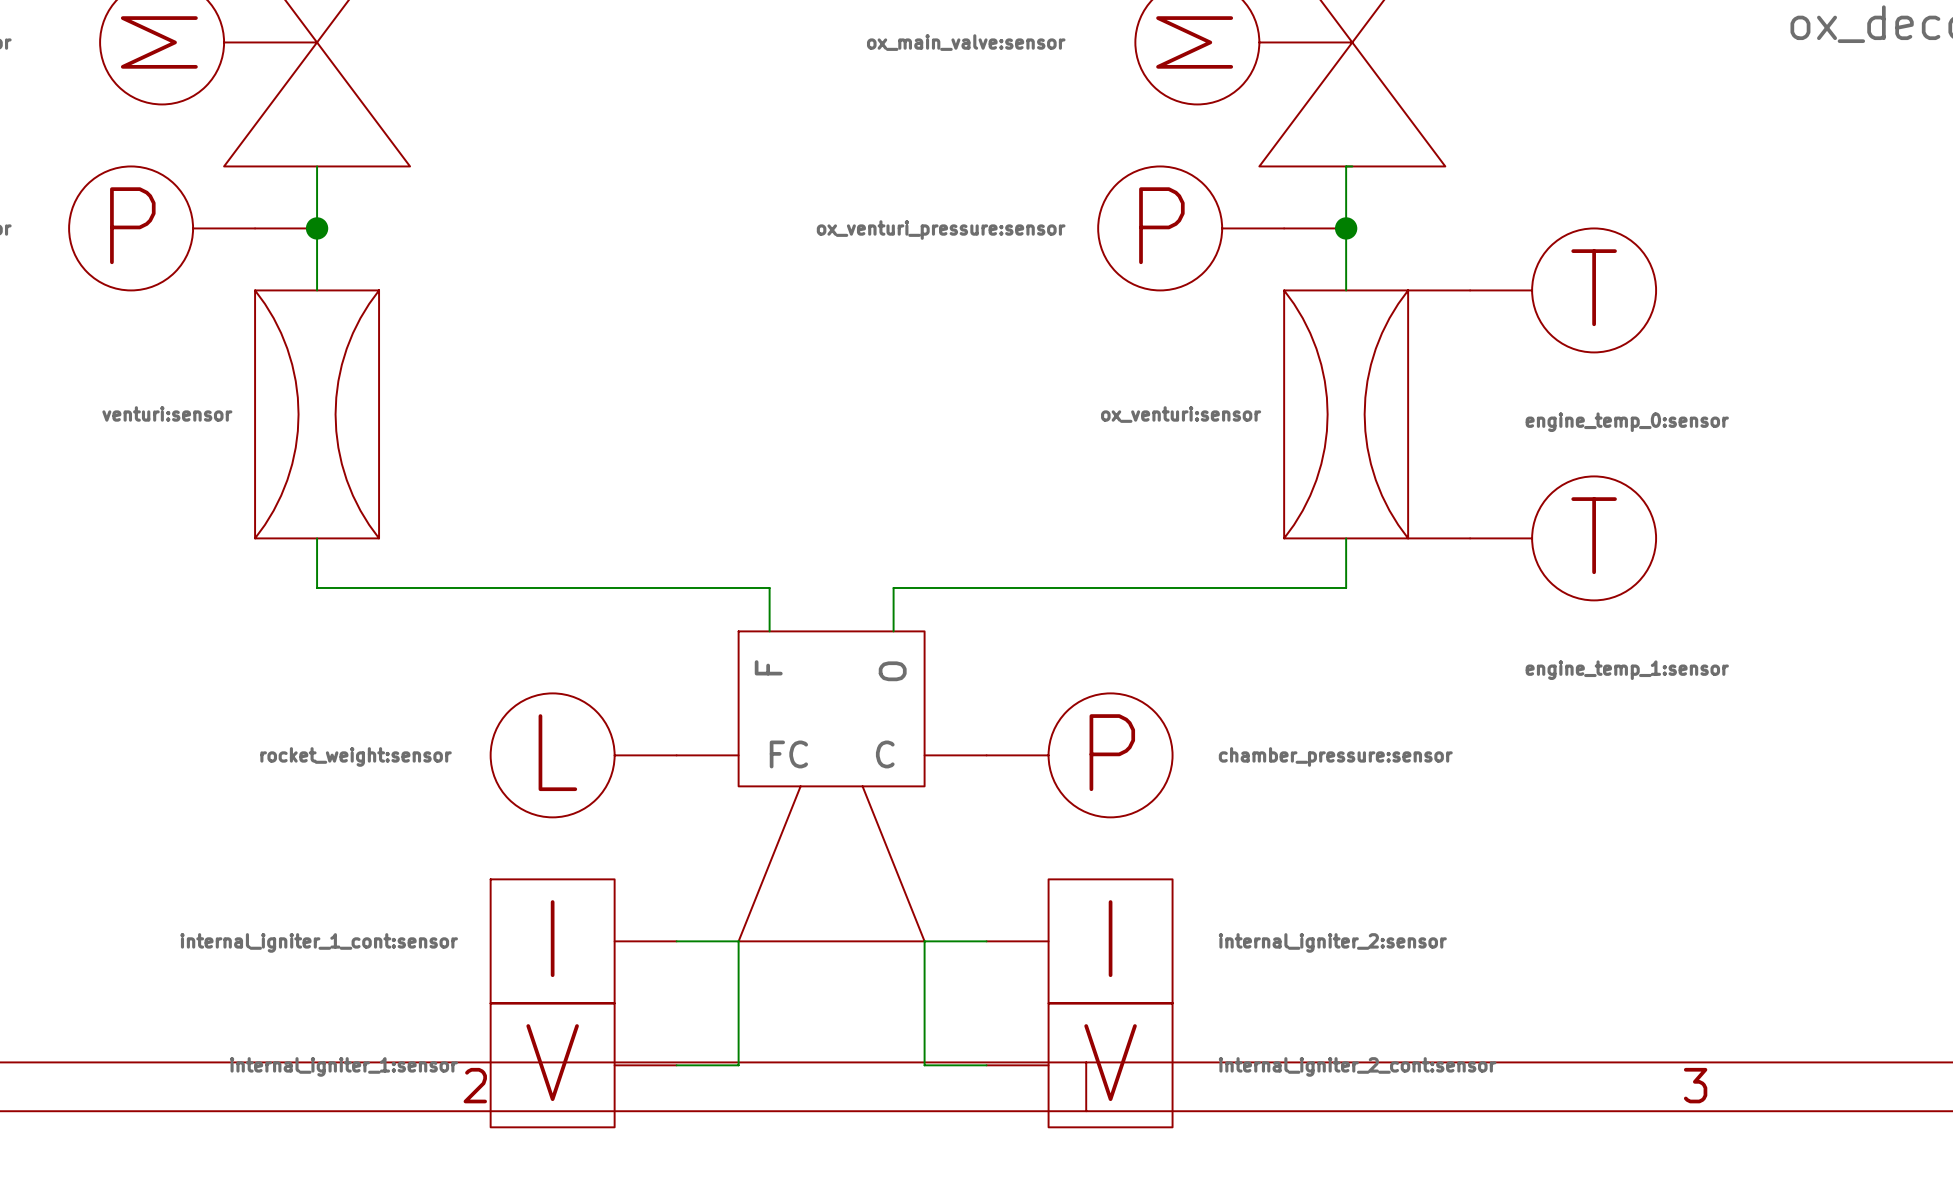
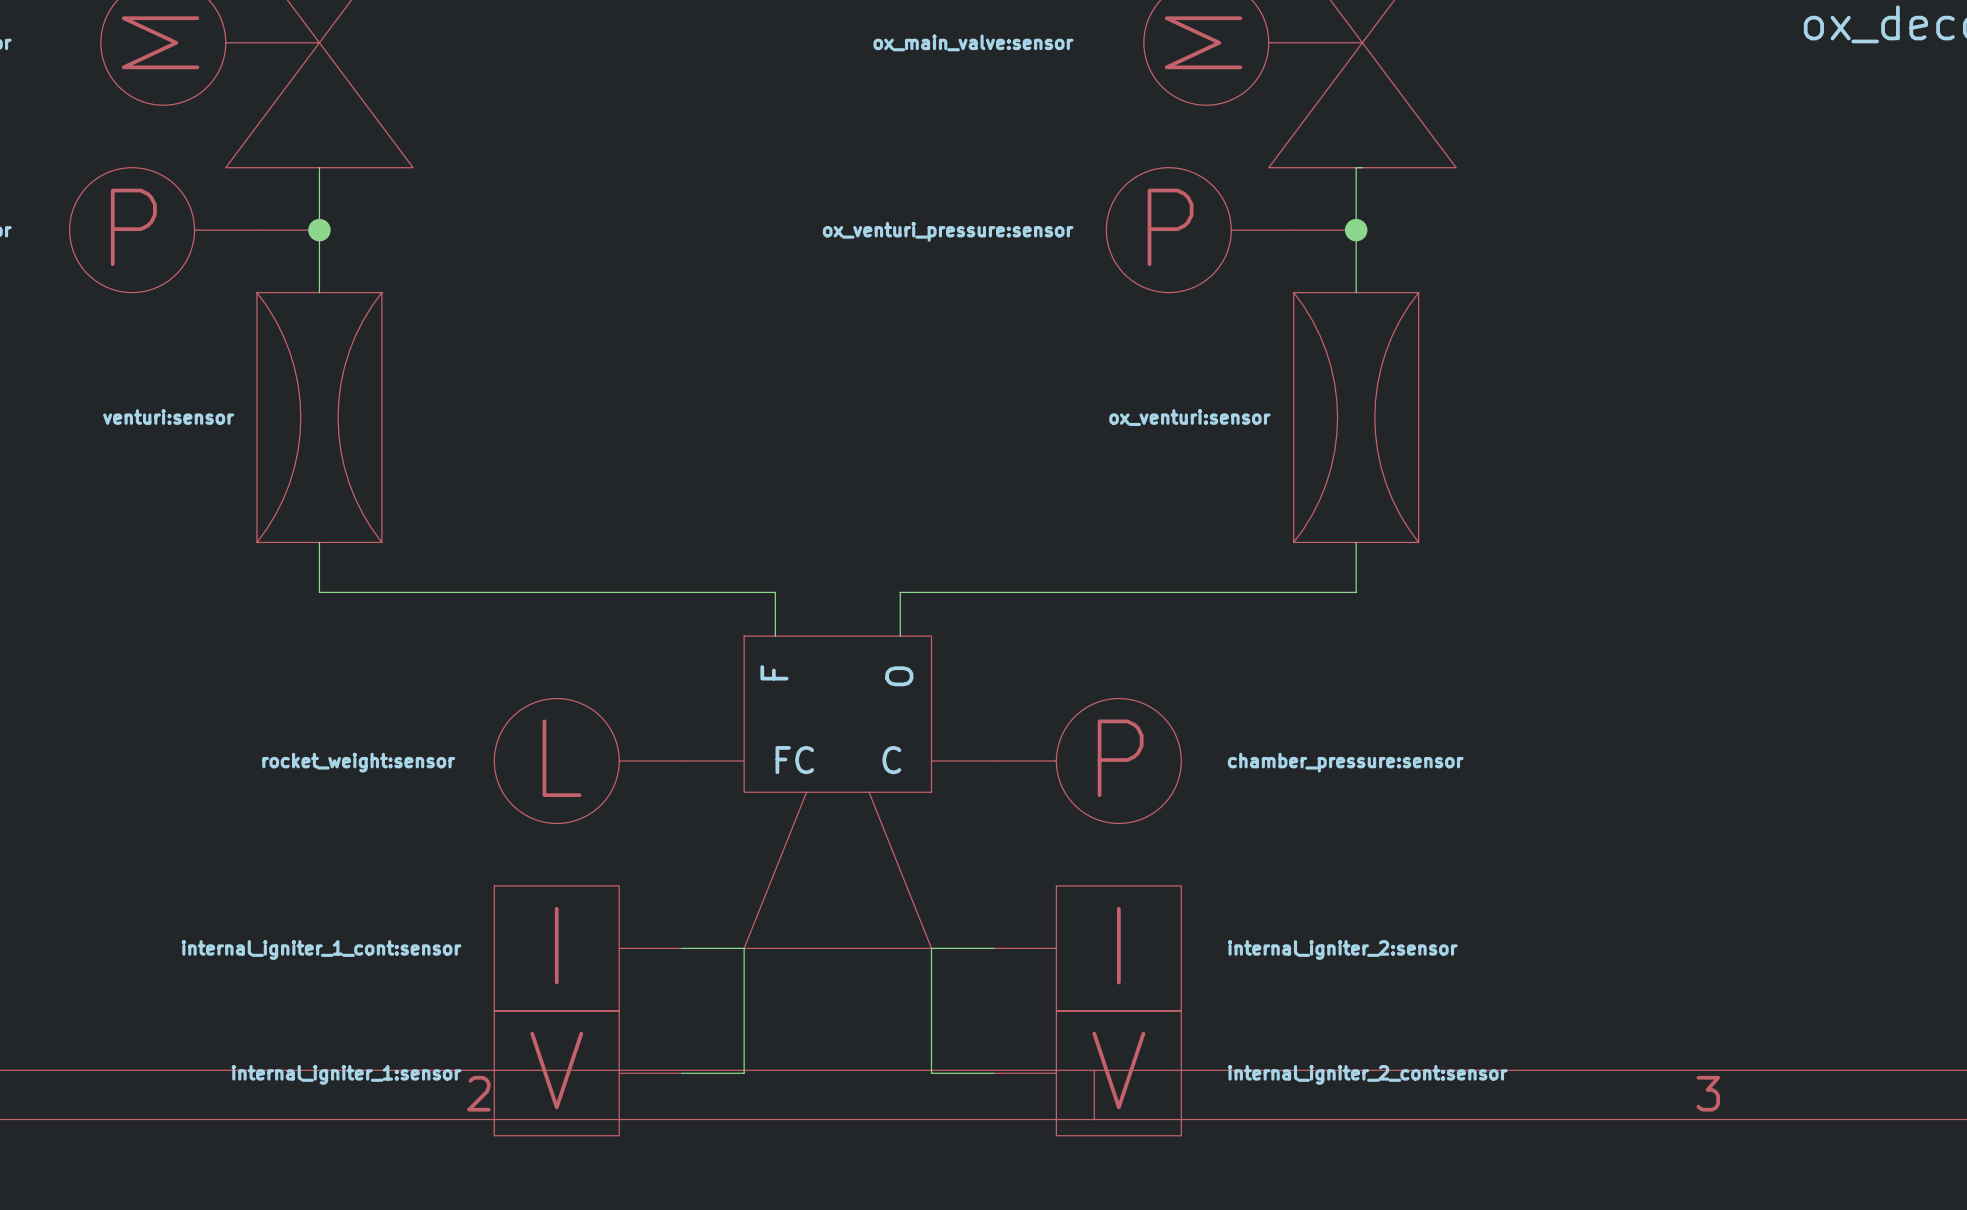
part: engine_temp_0:sensor (1532, 290) -> none
part: engine_temp_1:sensor (1532, 538) -> none

